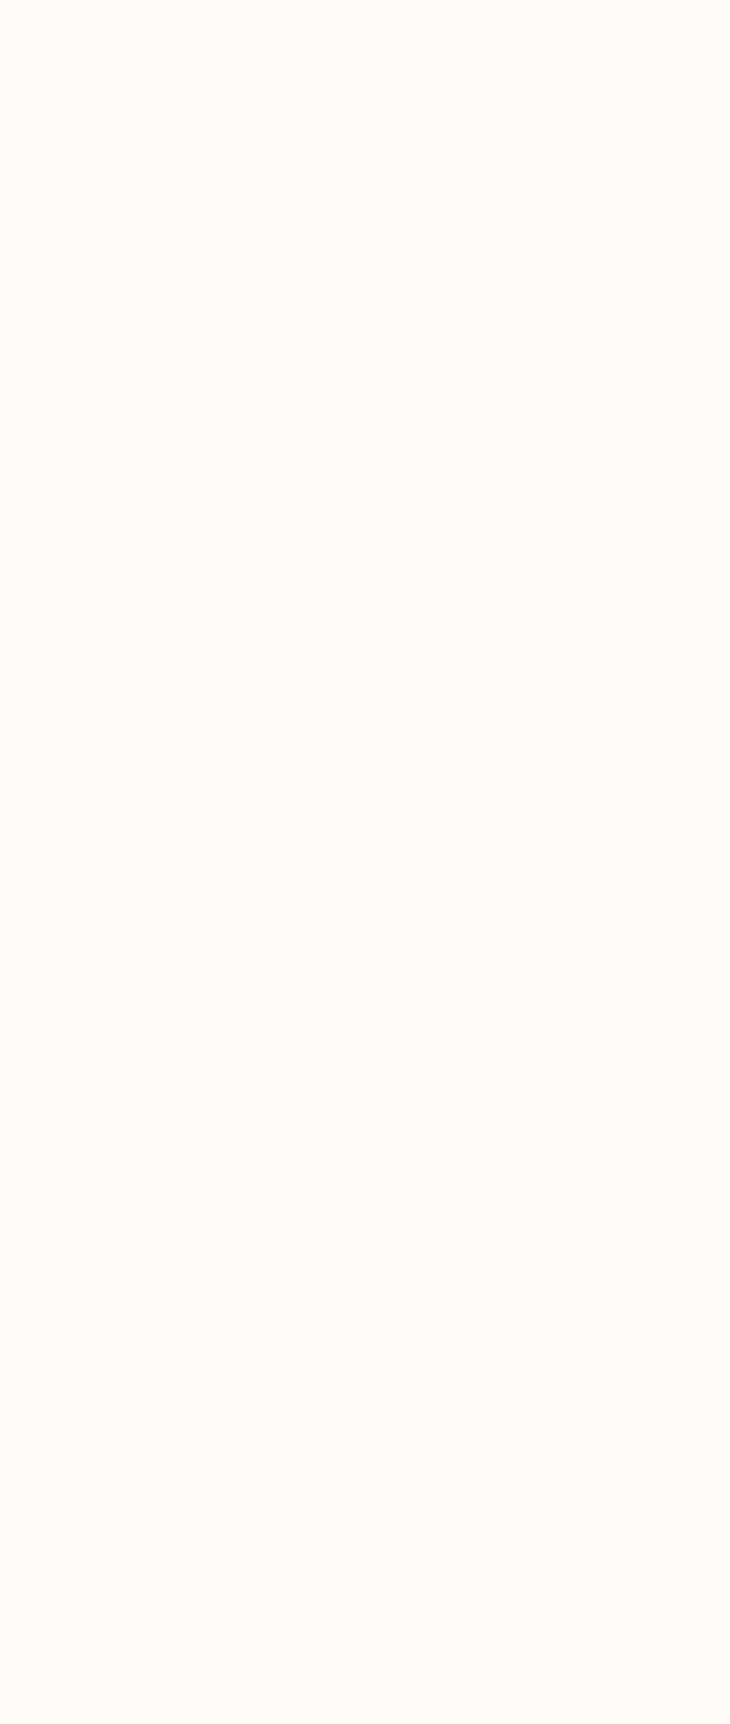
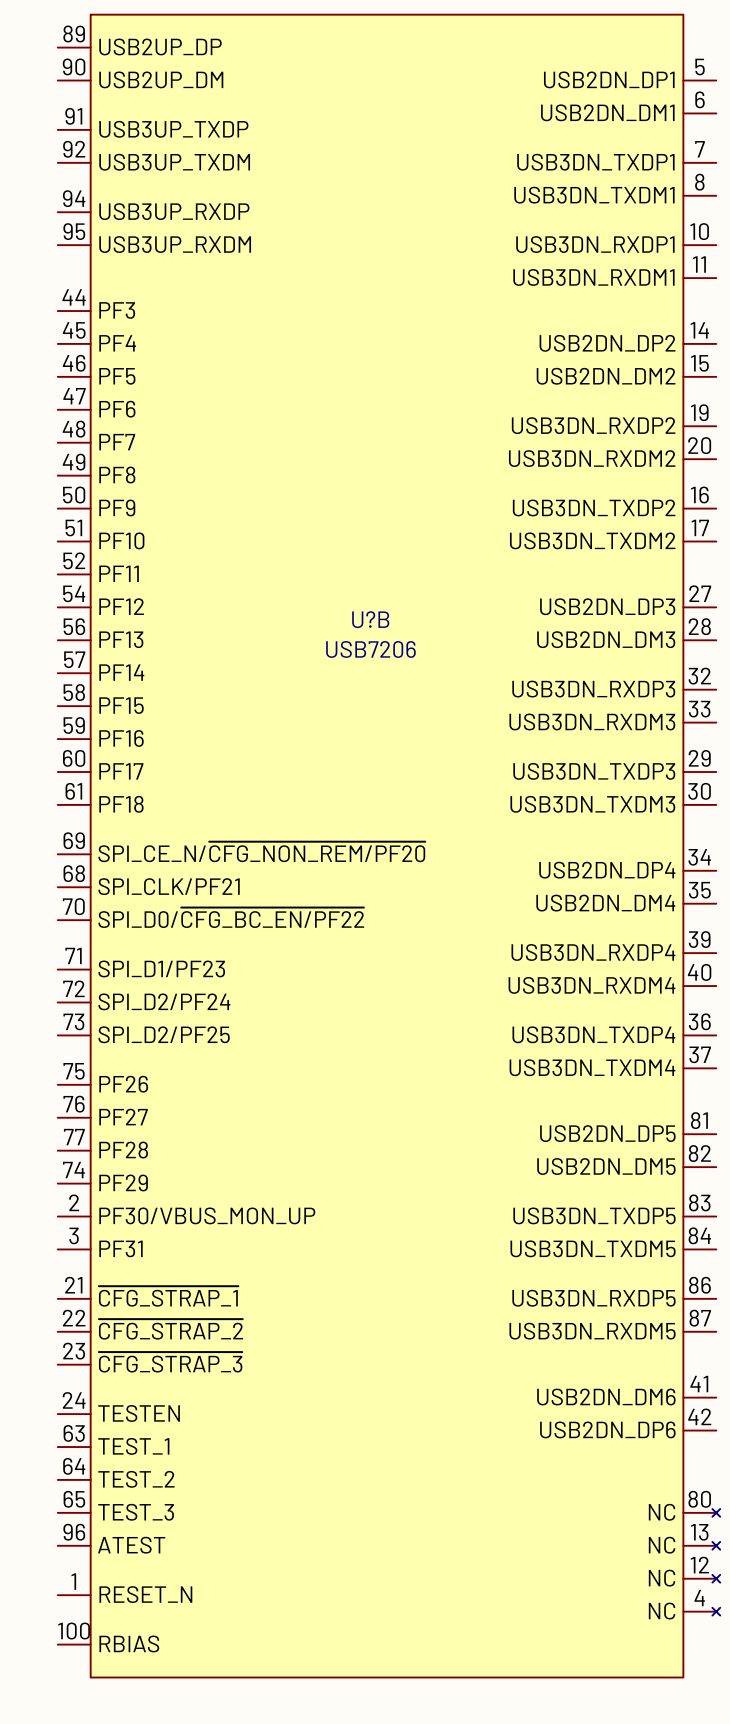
U?B: none -> USB7206 (388, 846)

